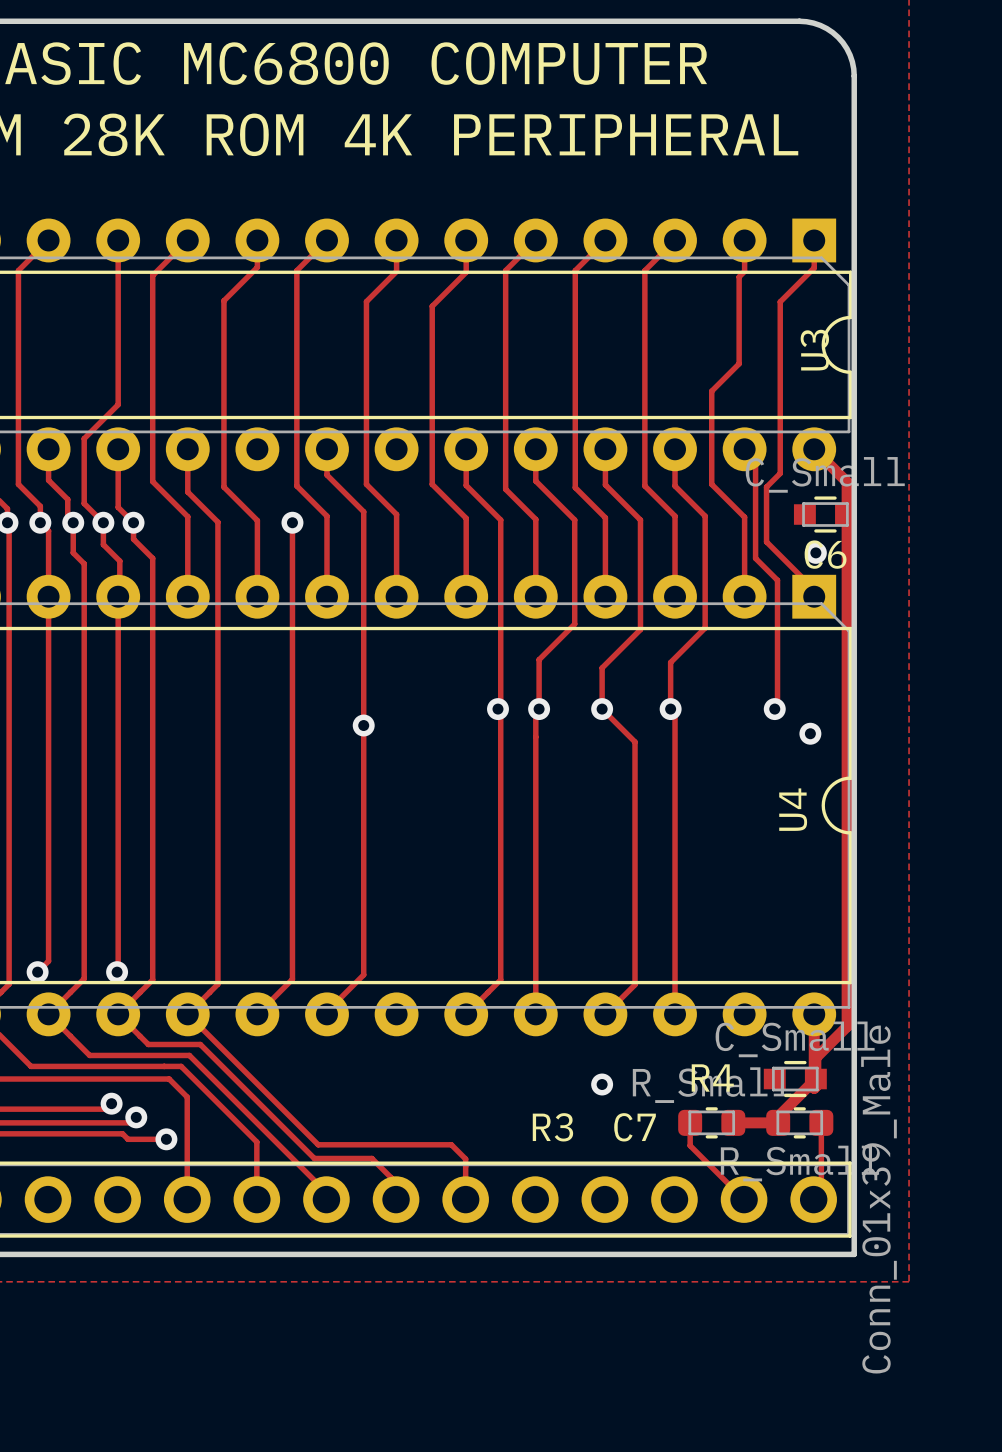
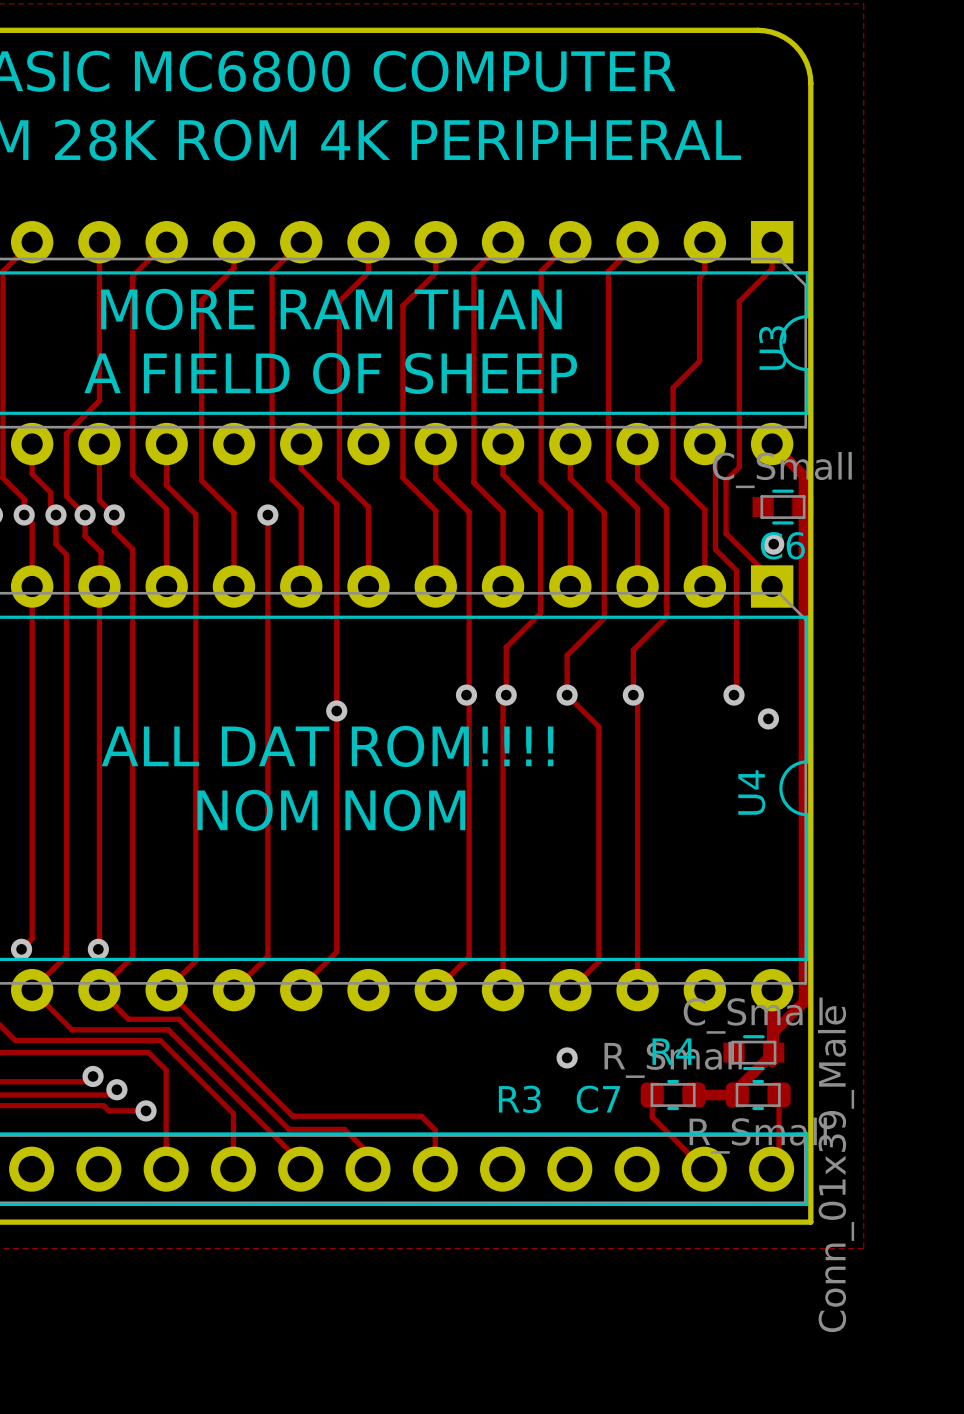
text: none -> MORE RAM THAN (331, 309)
text: none -> A FIELD OF SHEEP (330, 373)
text: none -> ALL DAT ROM!!!! (327, 746)
text: none -> NOM NOM (331, 810)

